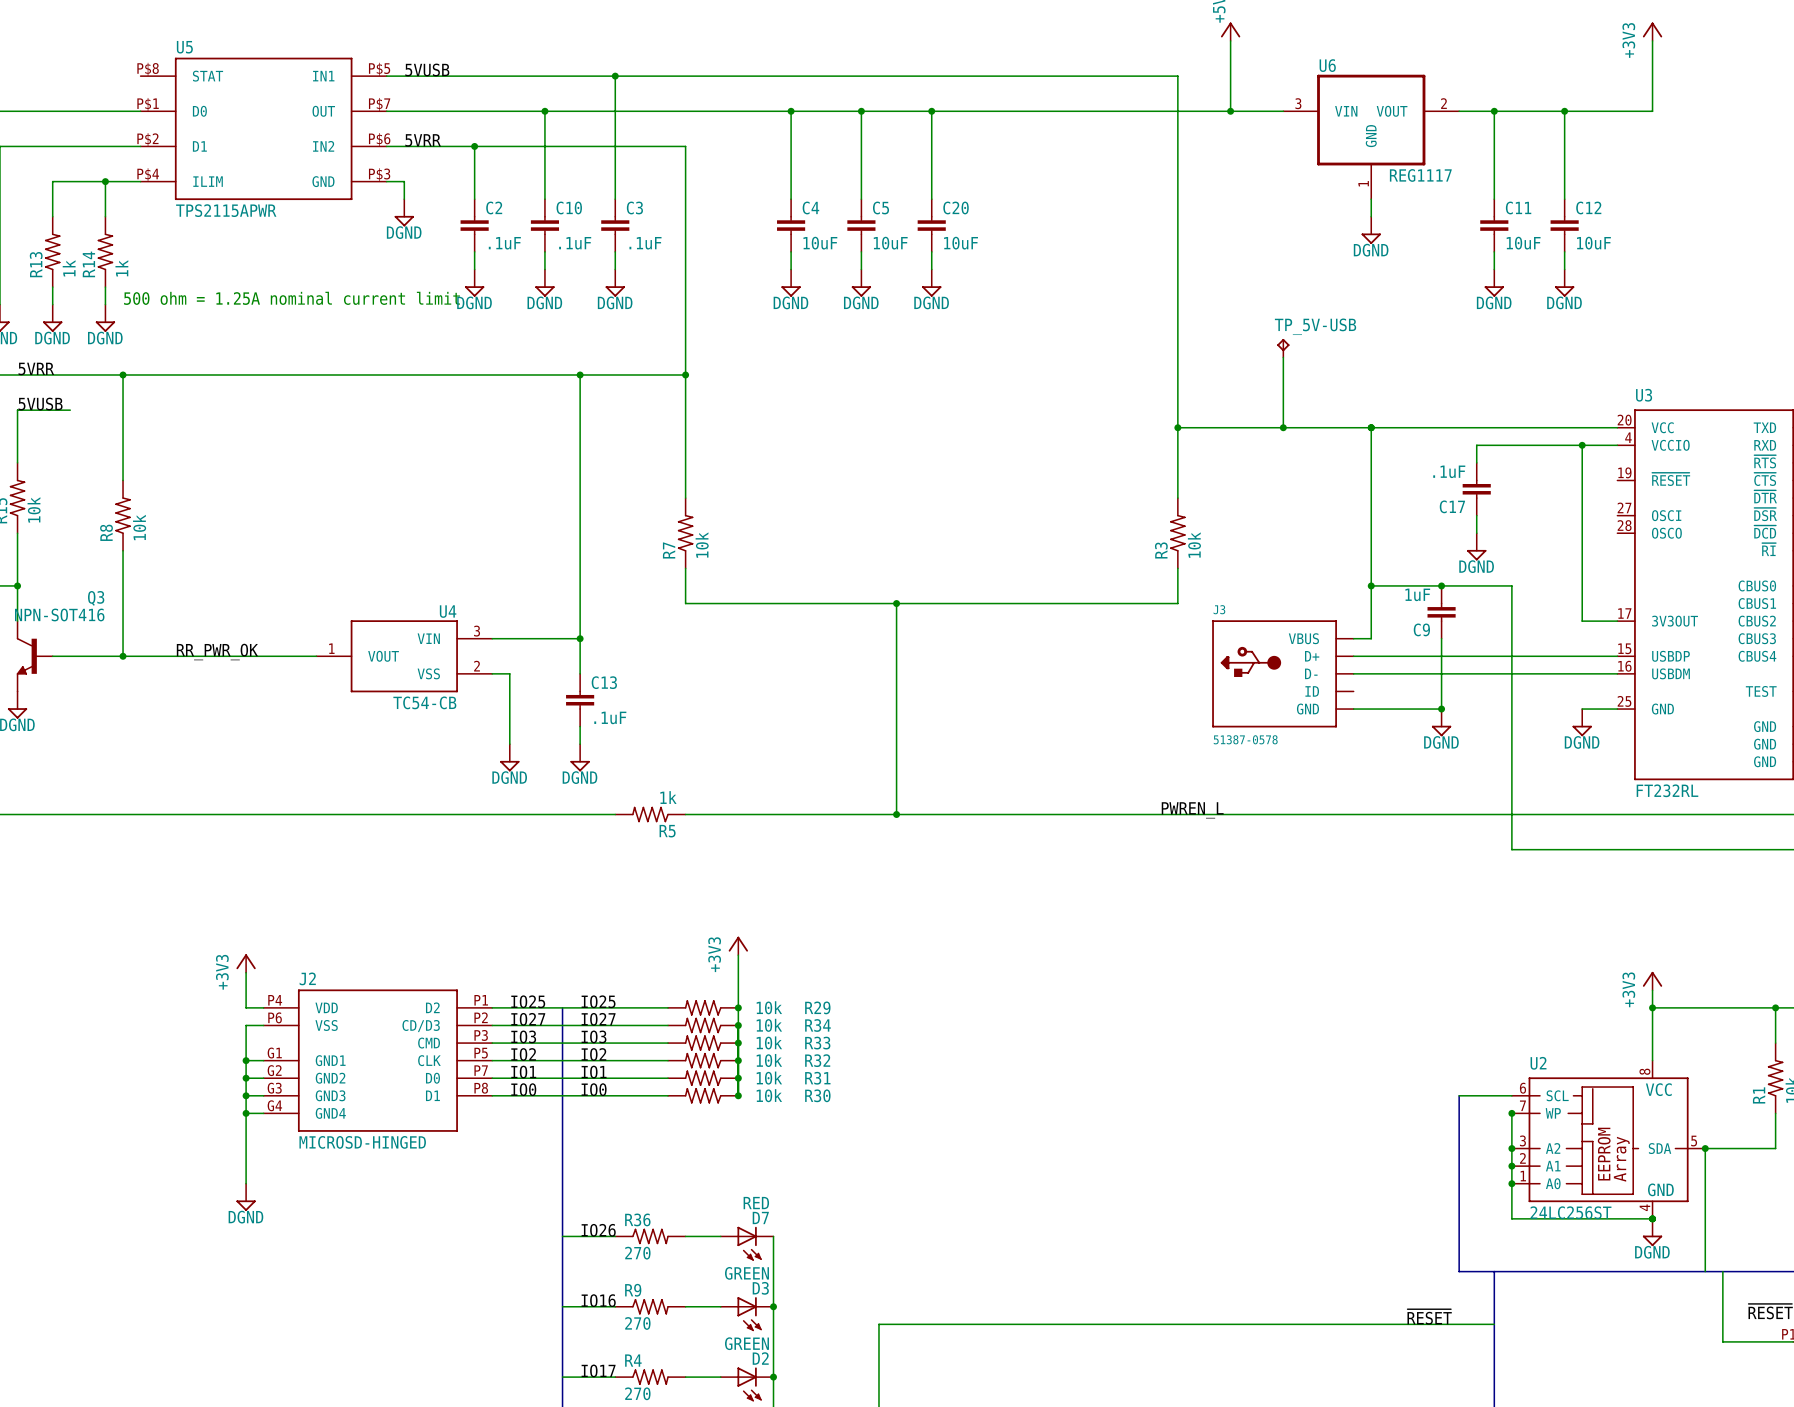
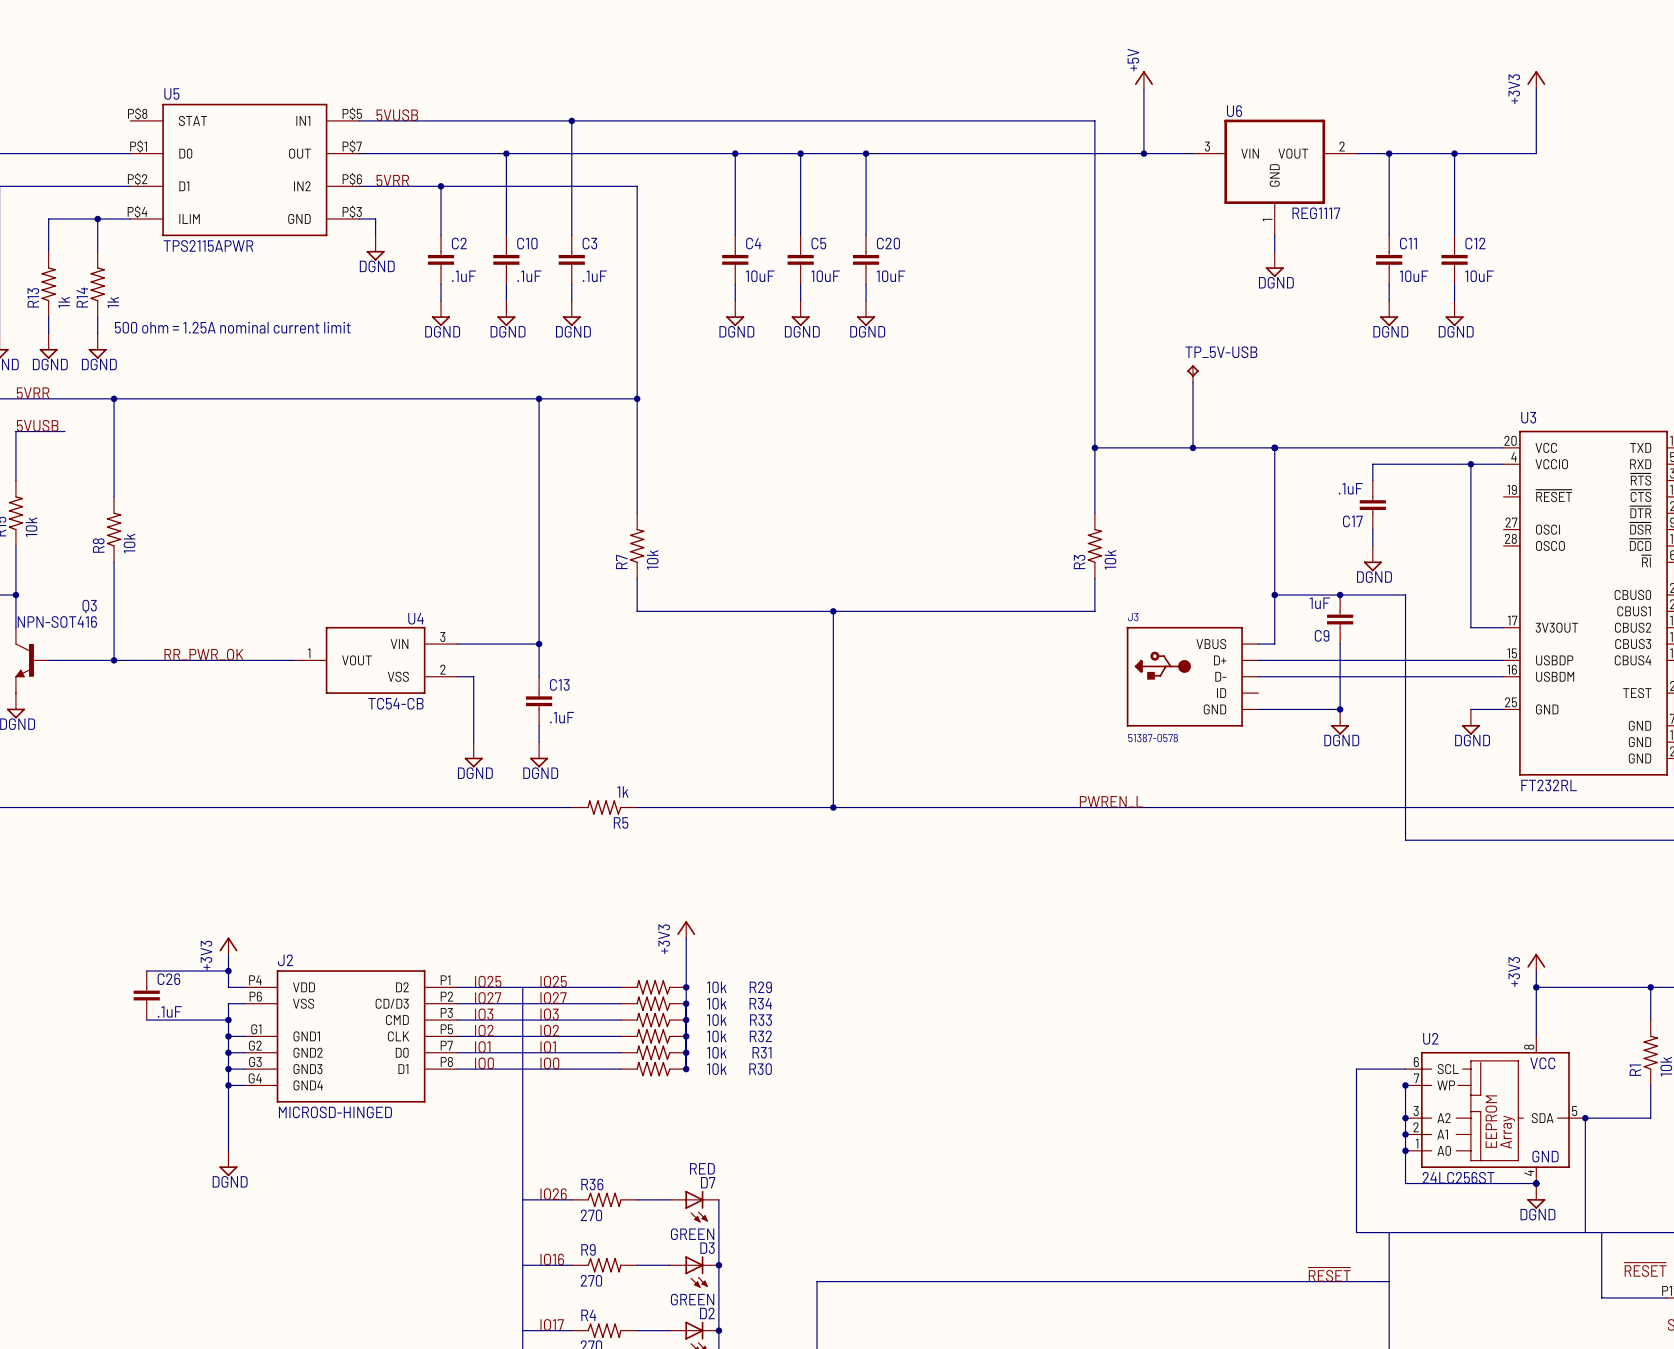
wire: none -> (146, 971) (228, 971)
junction: none -> (228, 971)
C26: none -> .1uF (146, 995)
wire: none -> (146, 1020) (228, 1020)
junction: none -> (228, 1020)

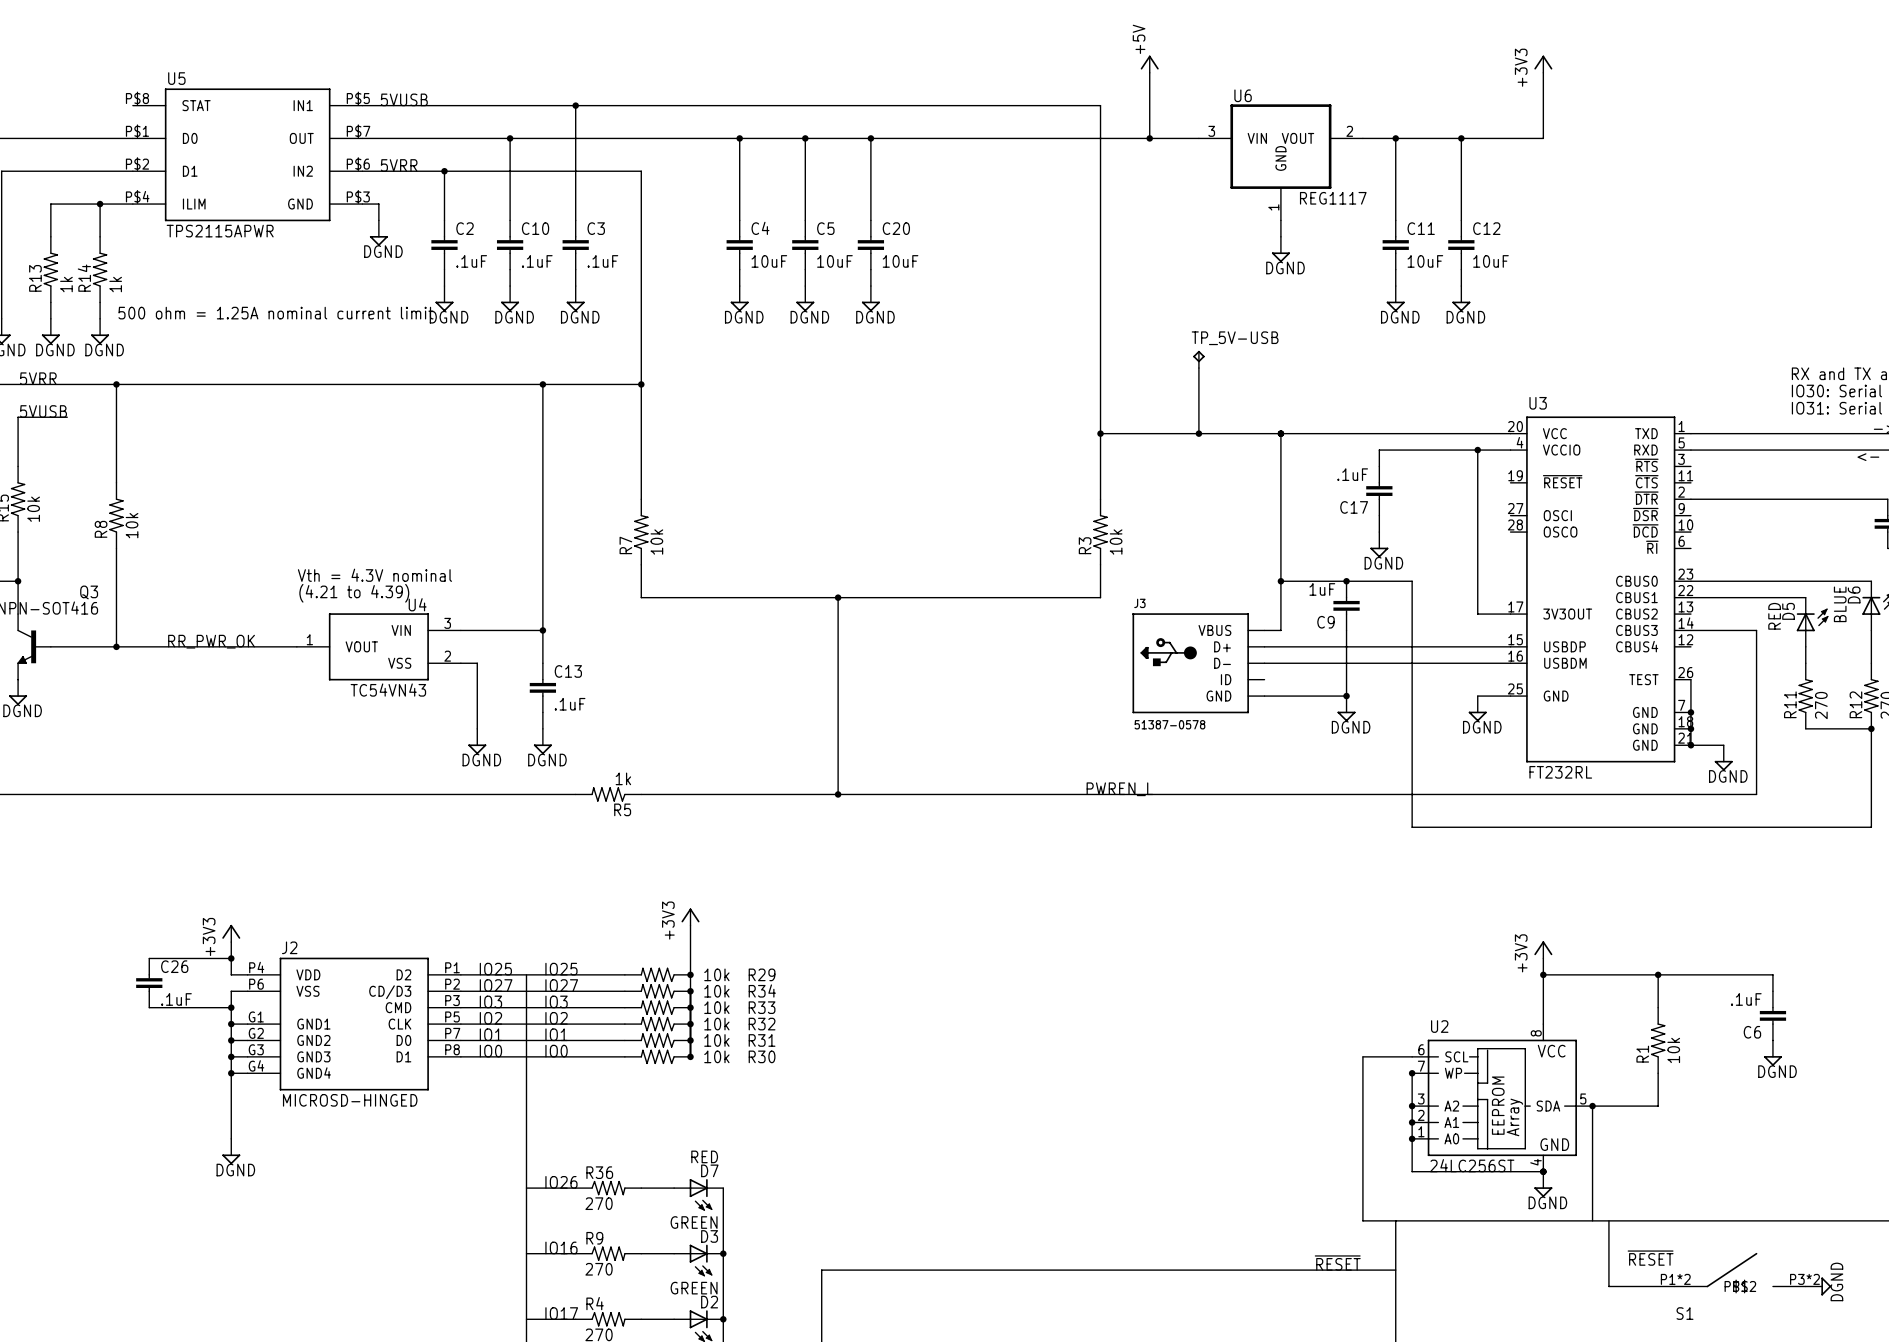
text: none -> Vth = 4.3V nominal (374, 575)
text: none -> (4.21 to 4.39) (354, 593)
U4 value: TC54-CB (395, 703) -> TC54VN43 (388, 690)

